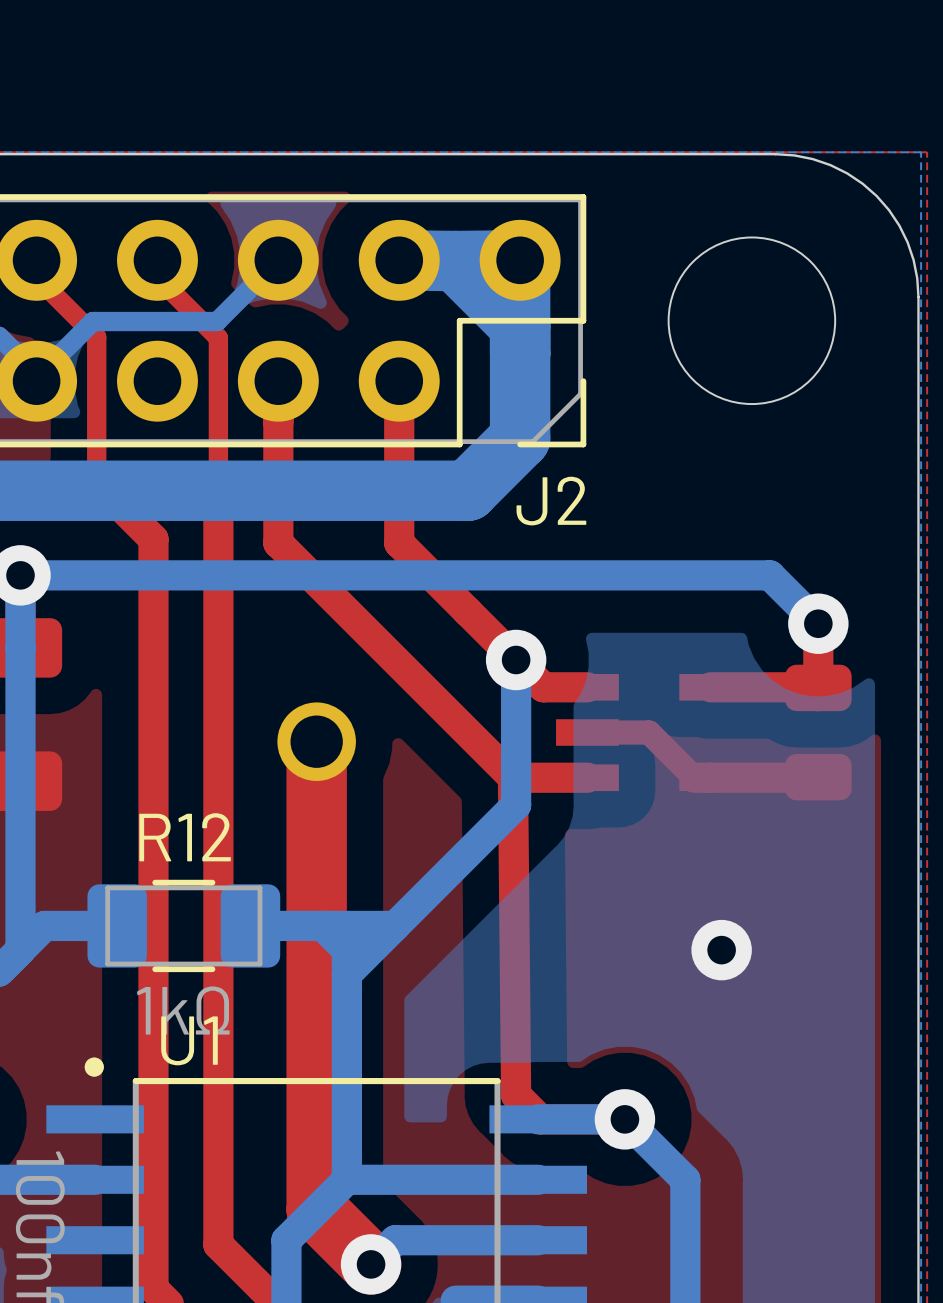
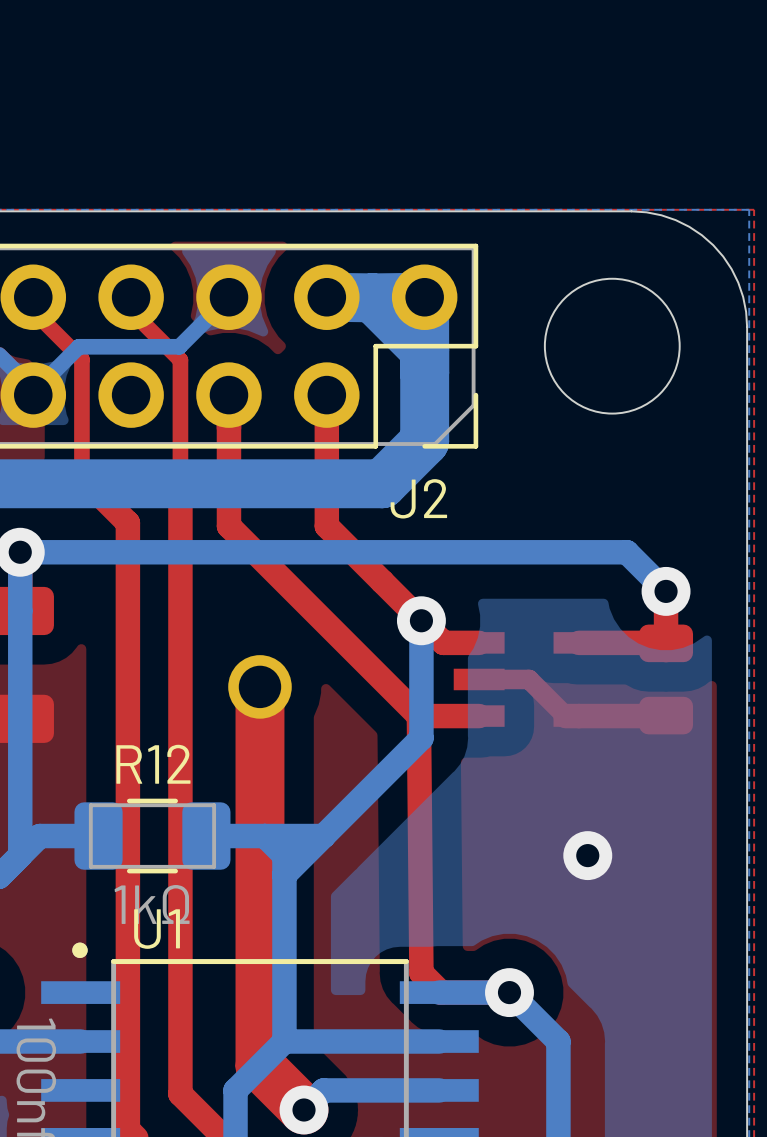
J2 name position: J2 (551, 501) -> J2 (418, 498)

